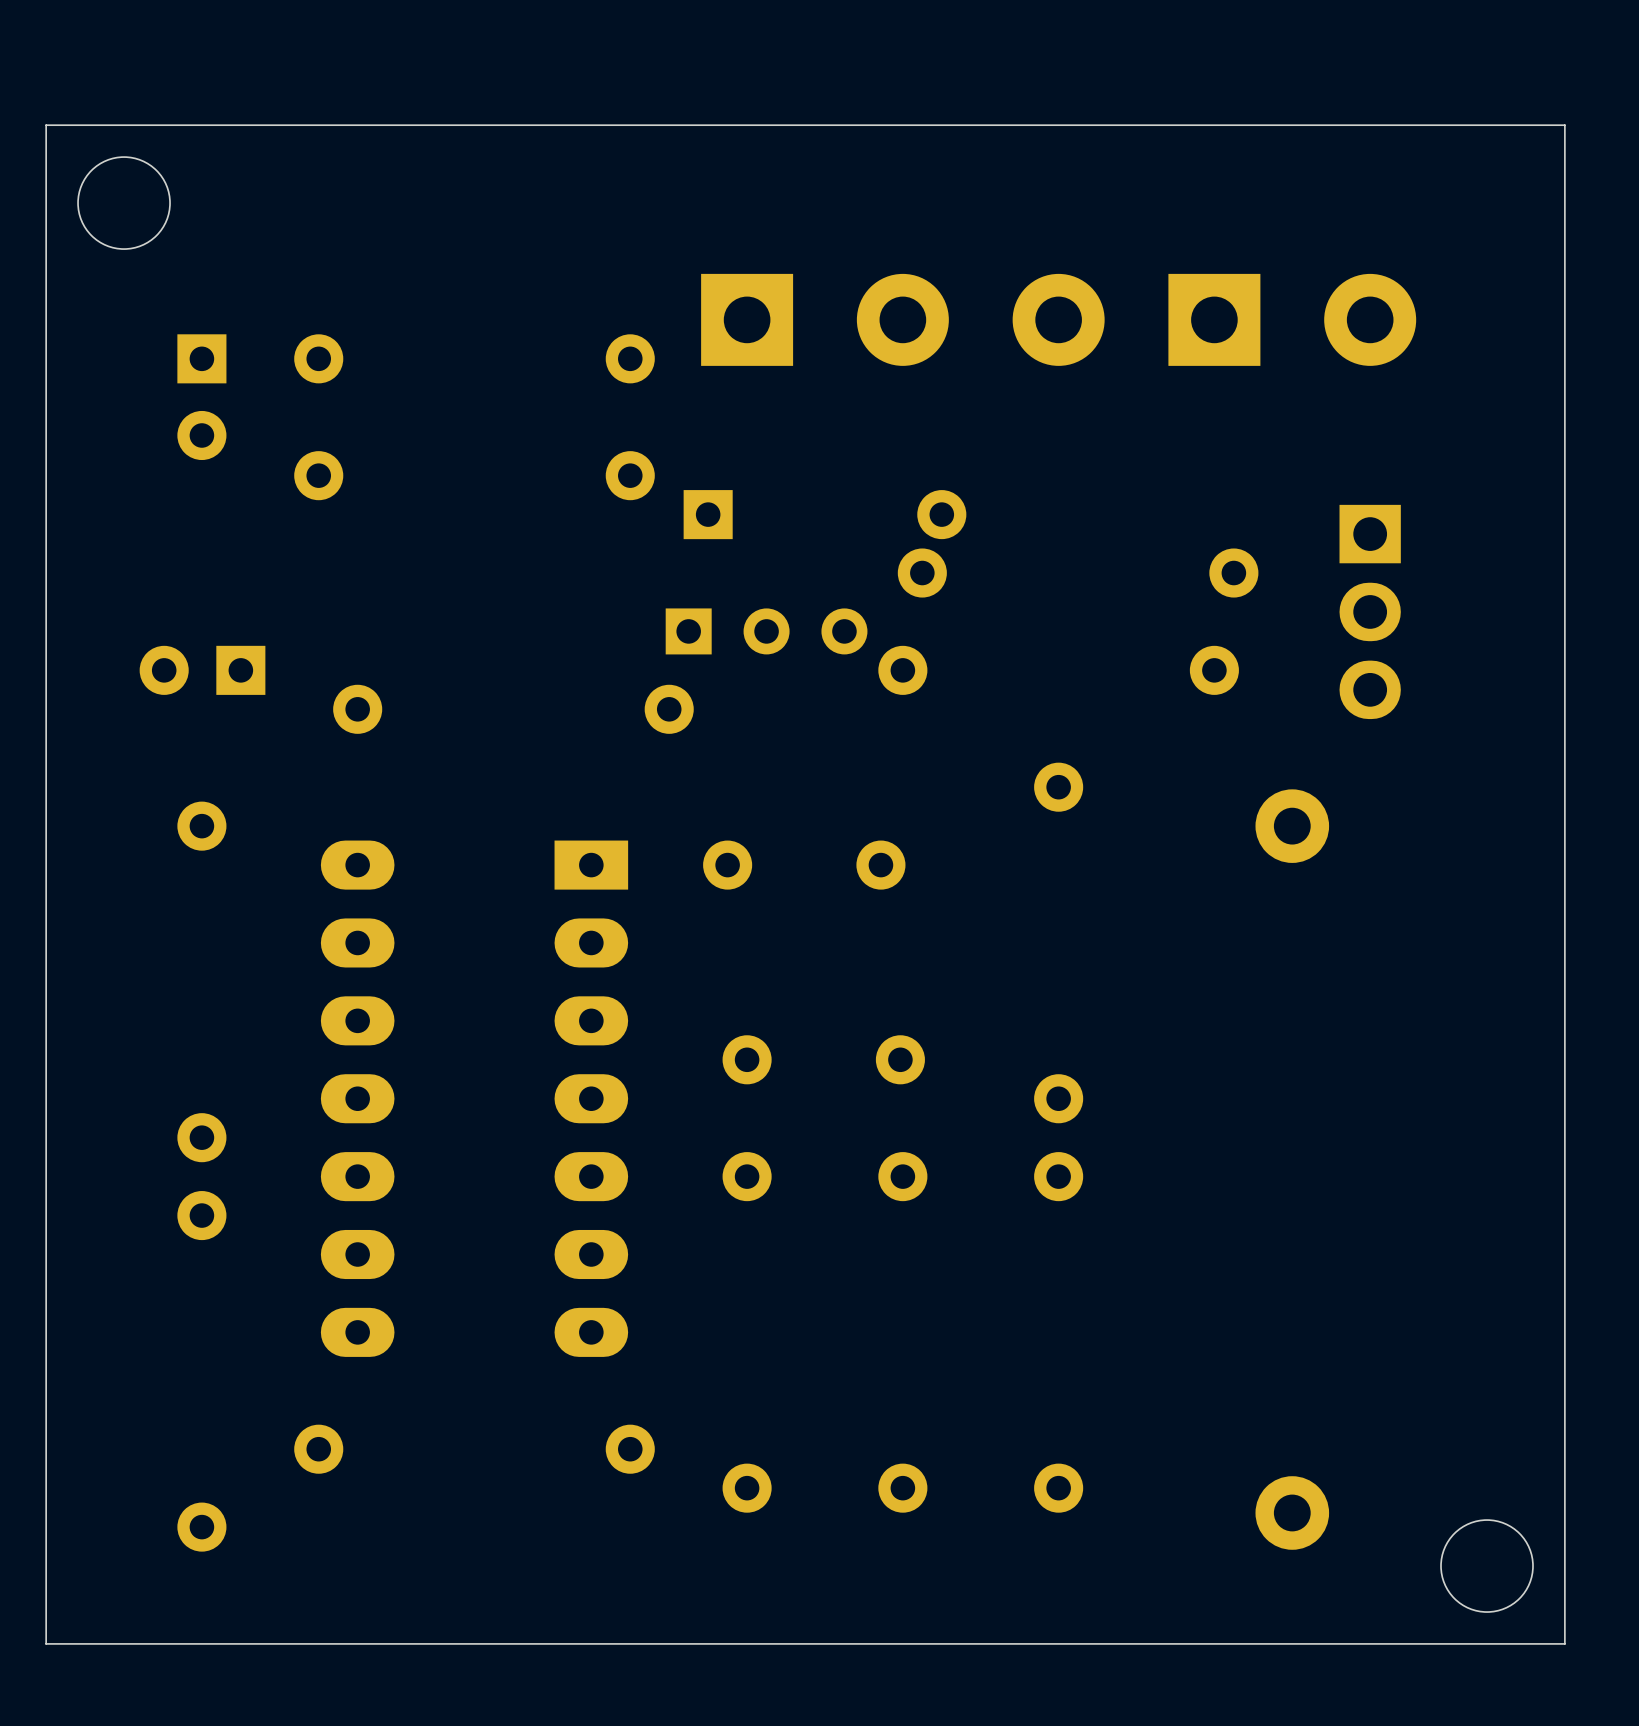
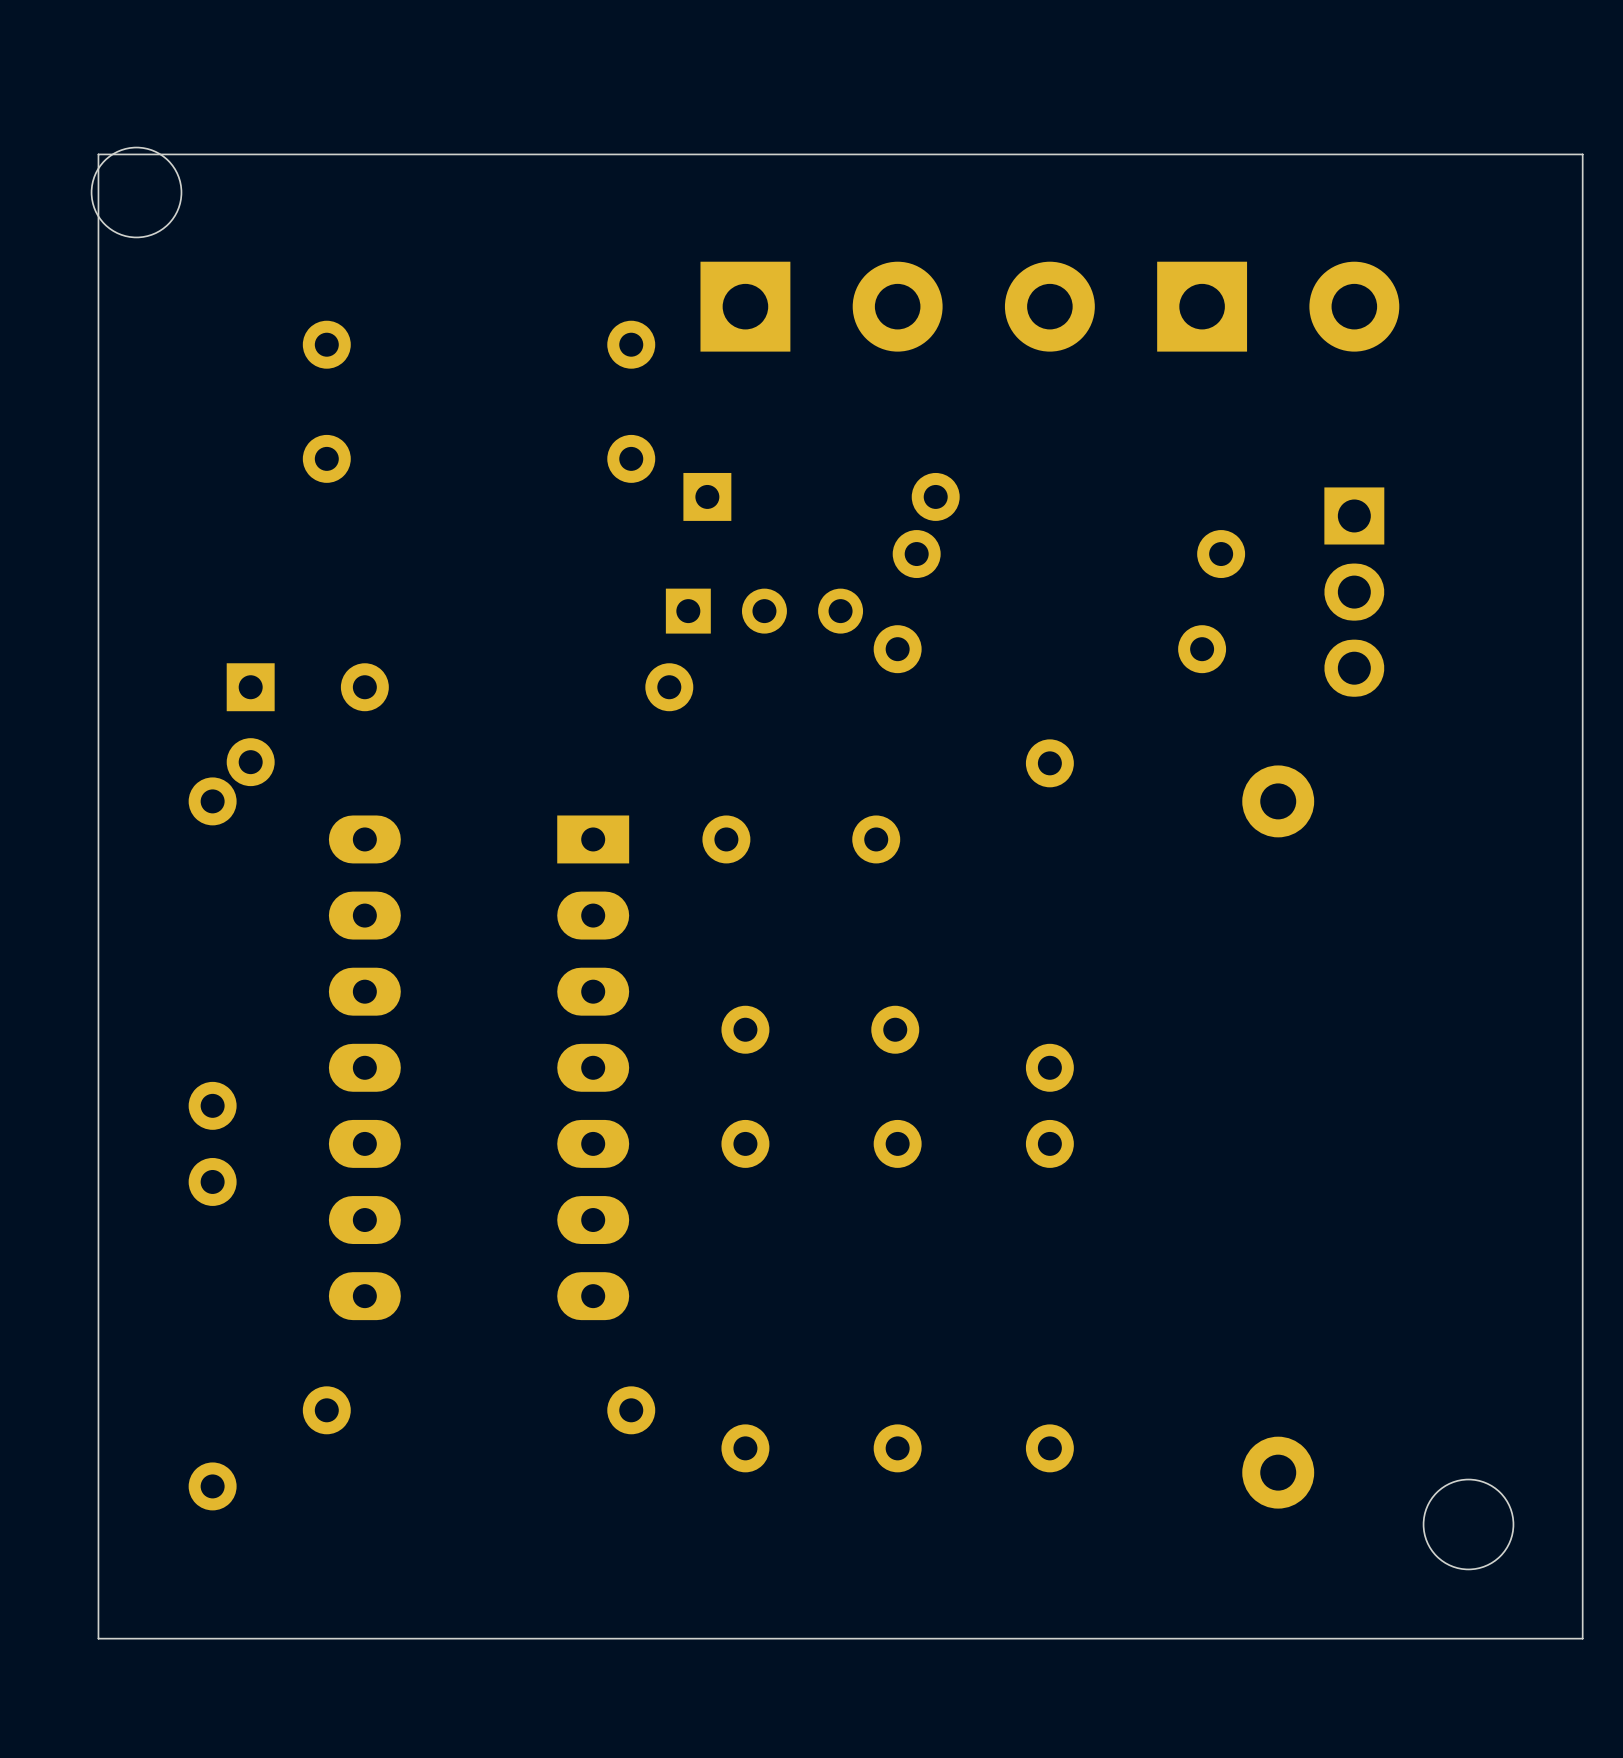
board edge: (1564, 125) (46, 125) (46, 1643) (1564, 1643) (1564, 125) -> (1582, 154) (98, 154) (98, 1638) (1582, 1638) (1582, 154)
part: (201, 397) -> none
part rotation: 0° (202, 670) -> 90° counterclockwise (250, 724)
part position: (202, 670) -> (250, 724)

